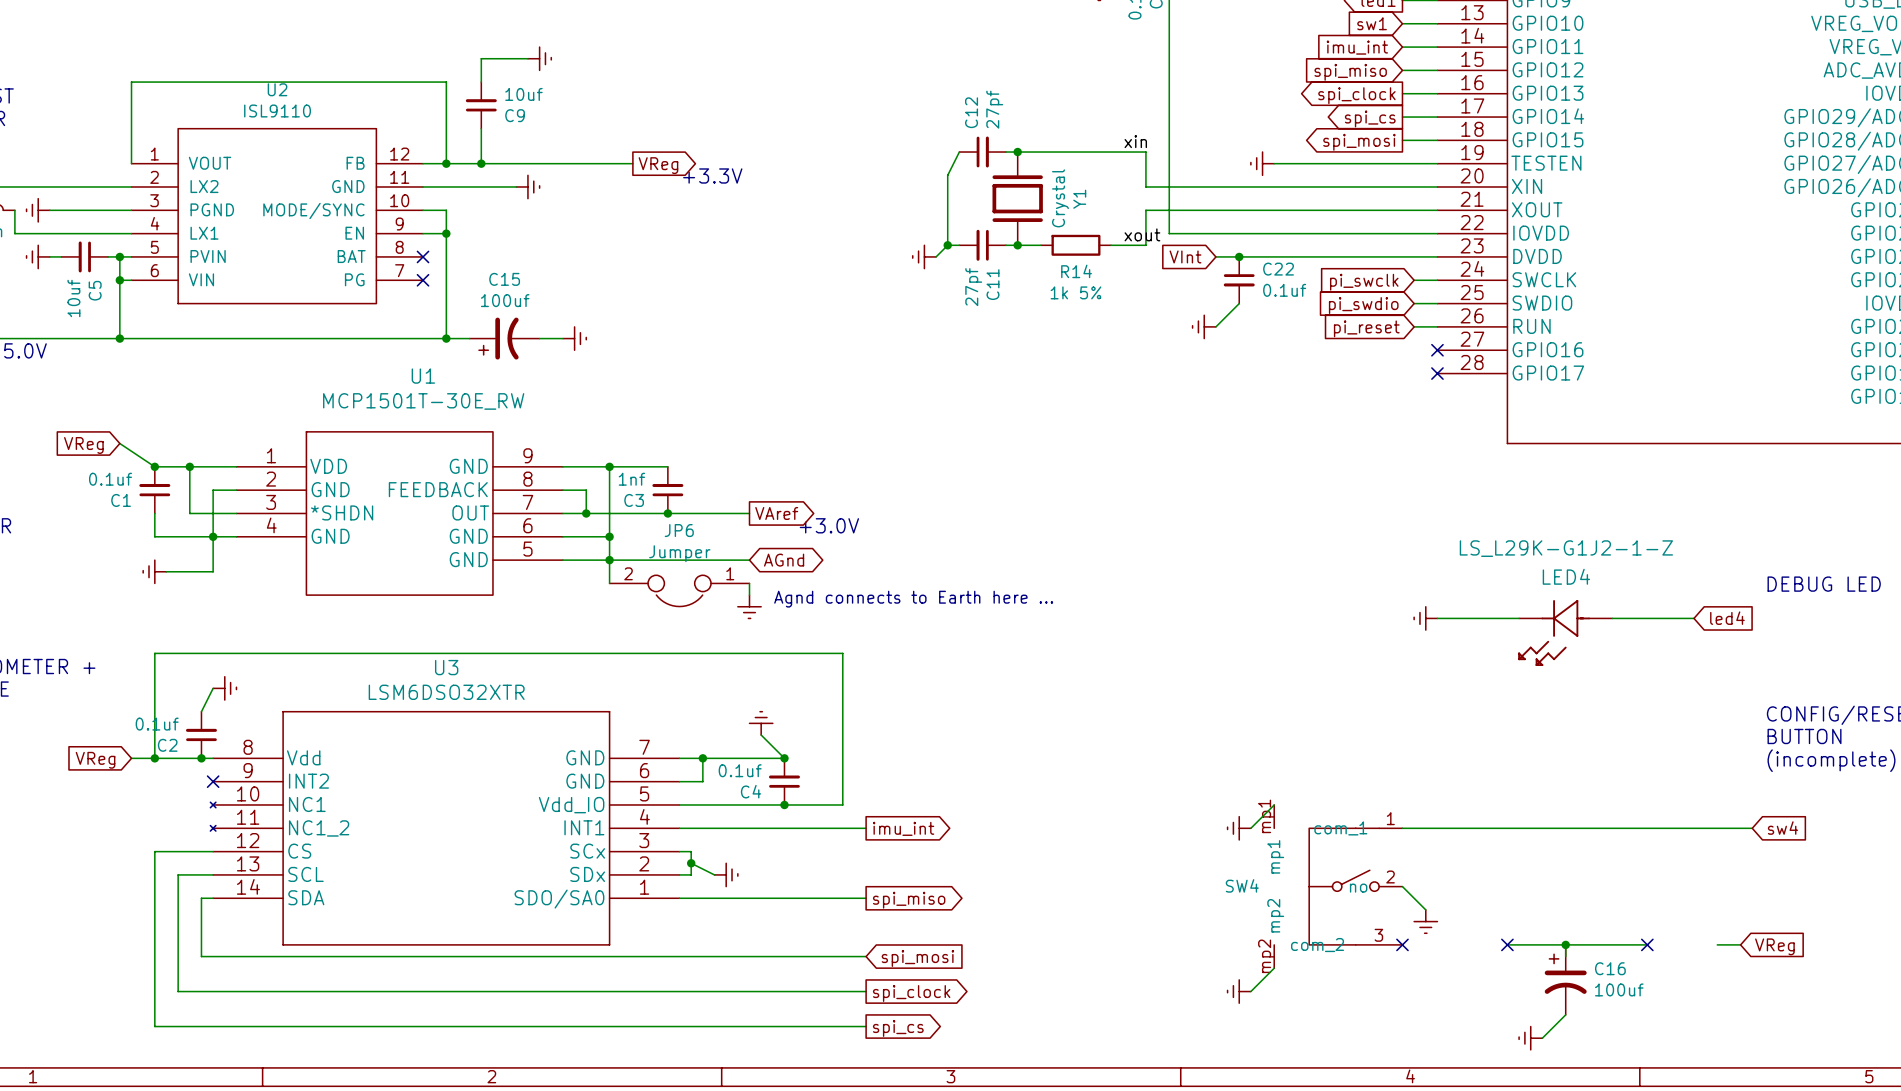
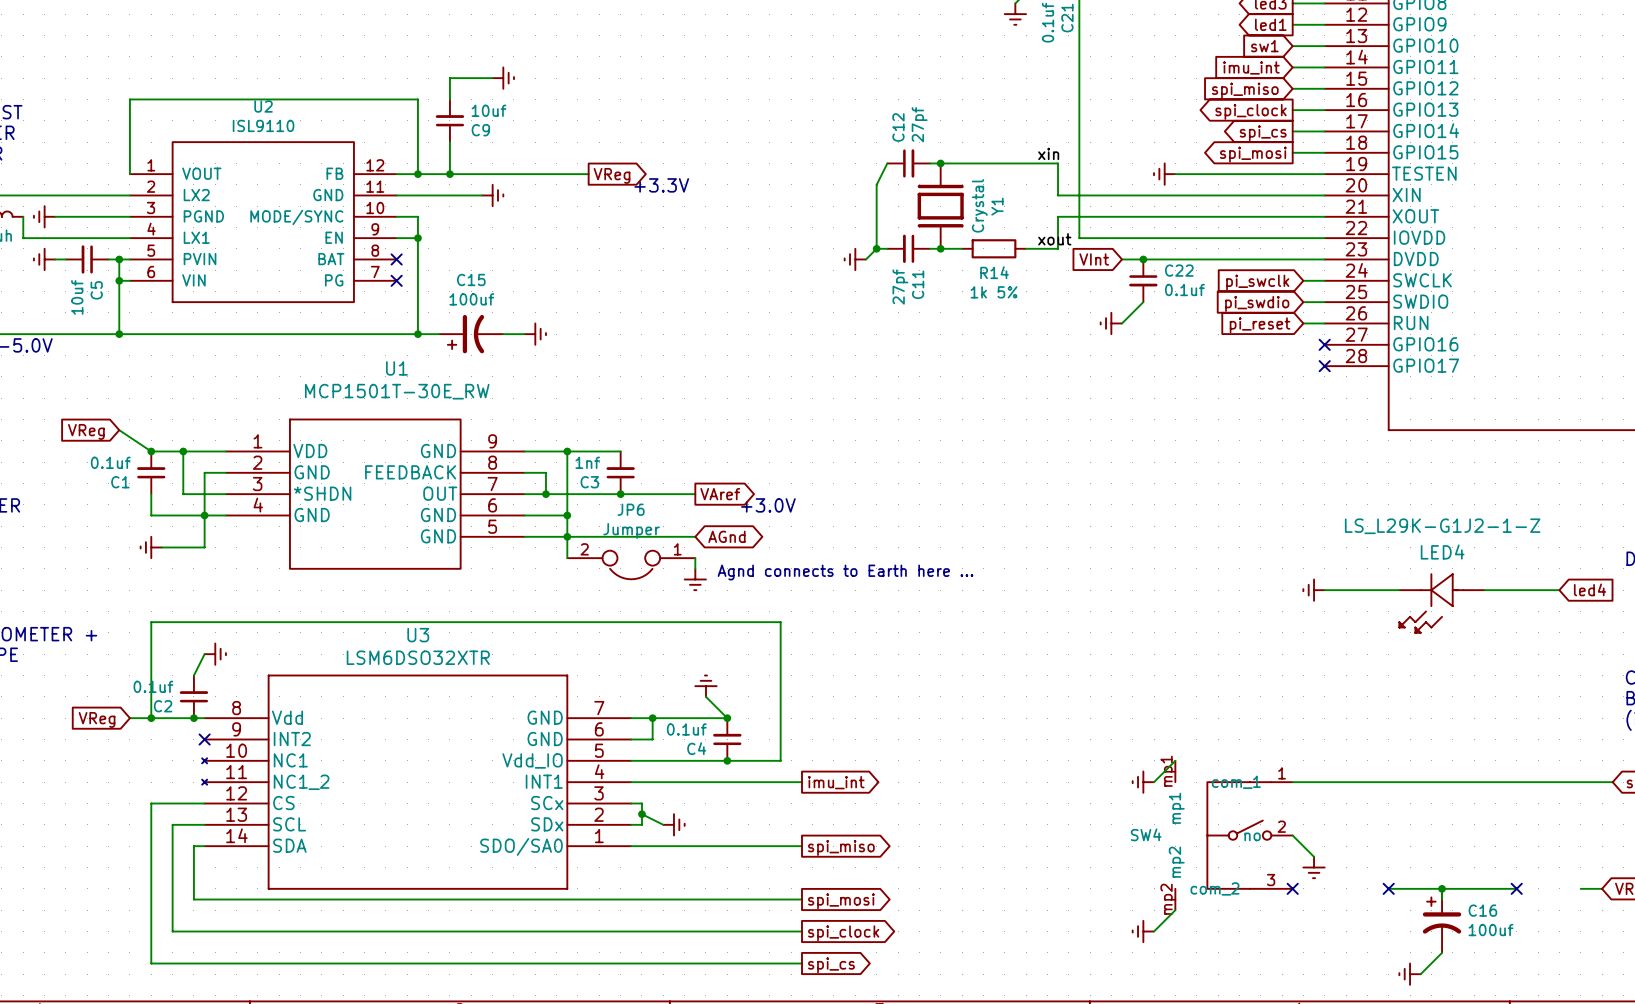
global label shape: input (917, 958) -> output (841, 901)

